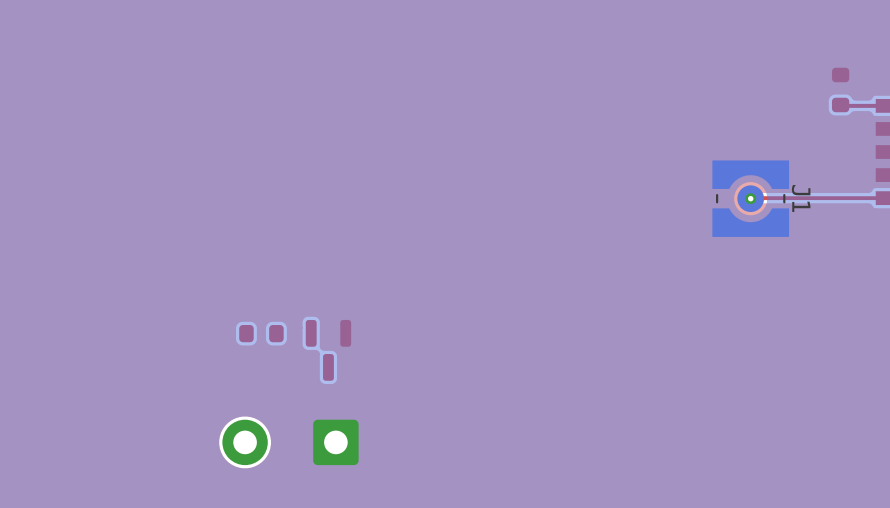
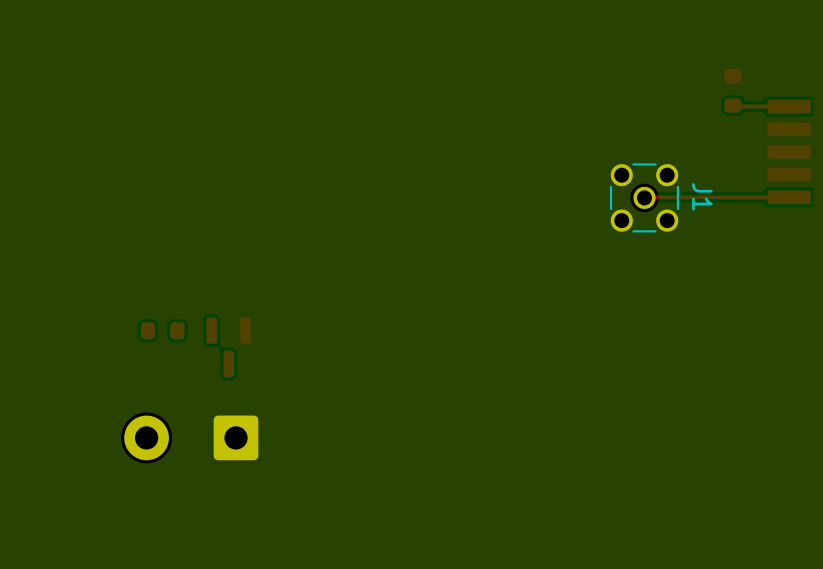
J1 footprint: [712, 160, 790, 237] -> [609, 163, 680, 233]

